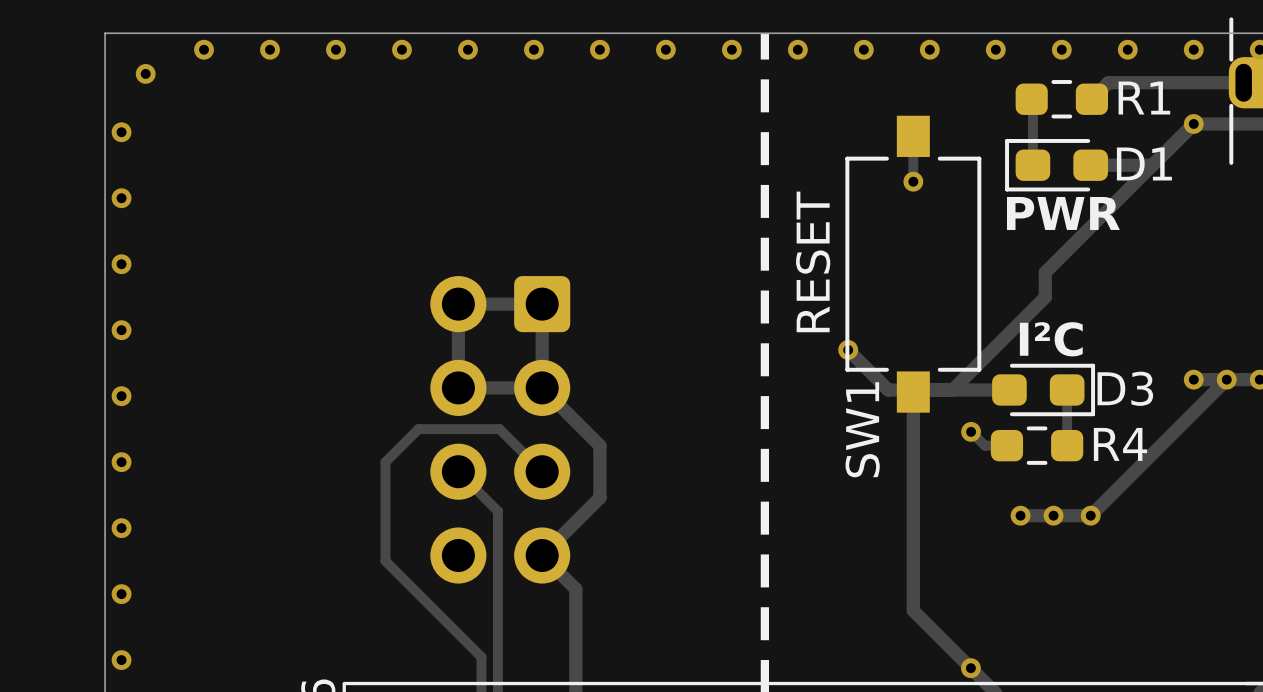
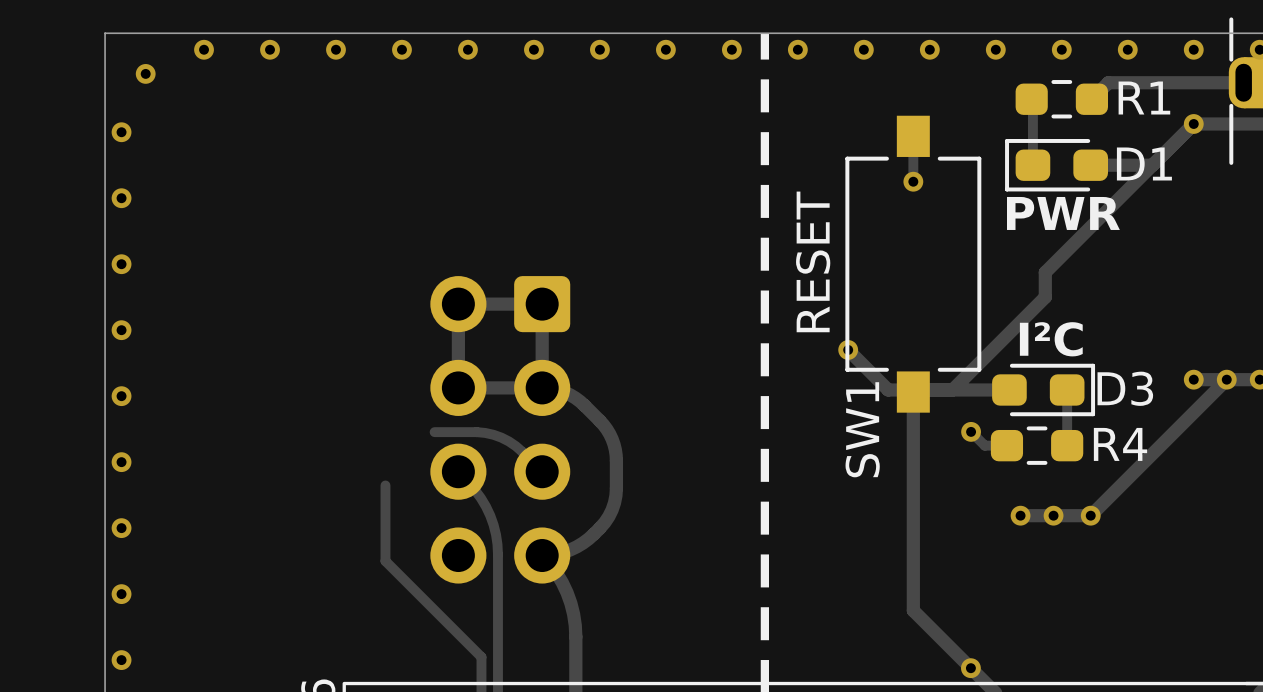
track: (542, 387) (599, 445) (599, 497) (542, 555) (575, 589) (575, 636) -> (542, 387) (565, 392) (584, 405) (606, 429) (613, 444) (616, 455) (615, 495) (612, 509) (604, 522) (588, 538) (576, 546) (563, 552) (542, 555) (556, 572) (567, 592) (573, 614) (575, 636)
track: (522, 451) (499, 429) (418, 429) (385, 462) (385, 485) -> (522, 451) (508, 441) (493, 434) (476, 432) (434, 432)
track: (458, 471) (497, 511) (497, 554) -> (468, 482) (480, 498) (490, 515) (496, 534) (497, 554)

